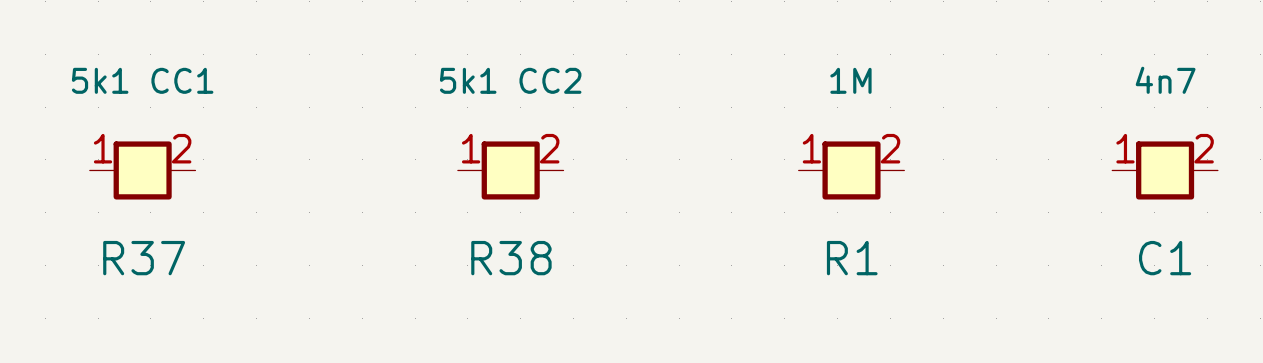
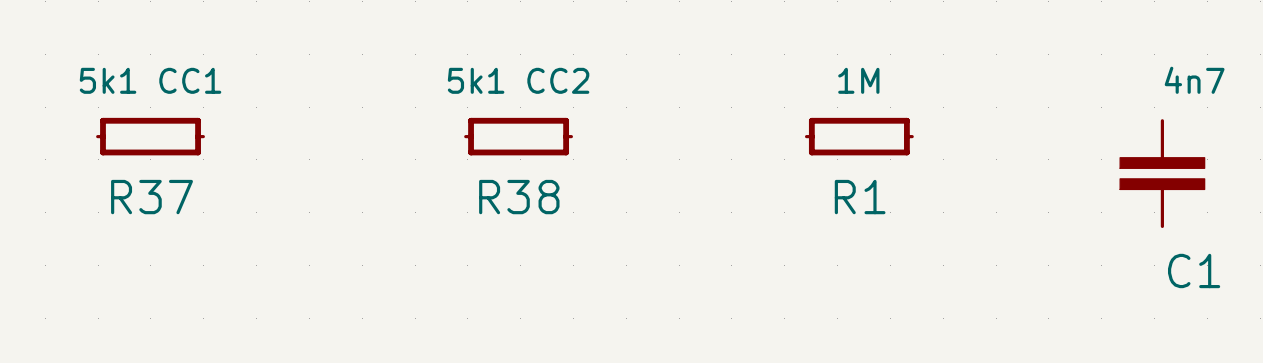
R37 symbol: [89, 141, 196, 200] -> [96, 117, 205, 156]
R38 symbol: [457, 141, 564, 200] -> [464, 117, 573, 156]
R1 symbol: [798, 141, 905, 200] -> [804, 117, 914, 156]
C1 symbol: [1112, 141, 1218, 200] -> [1120, 119, 1205, 228]

